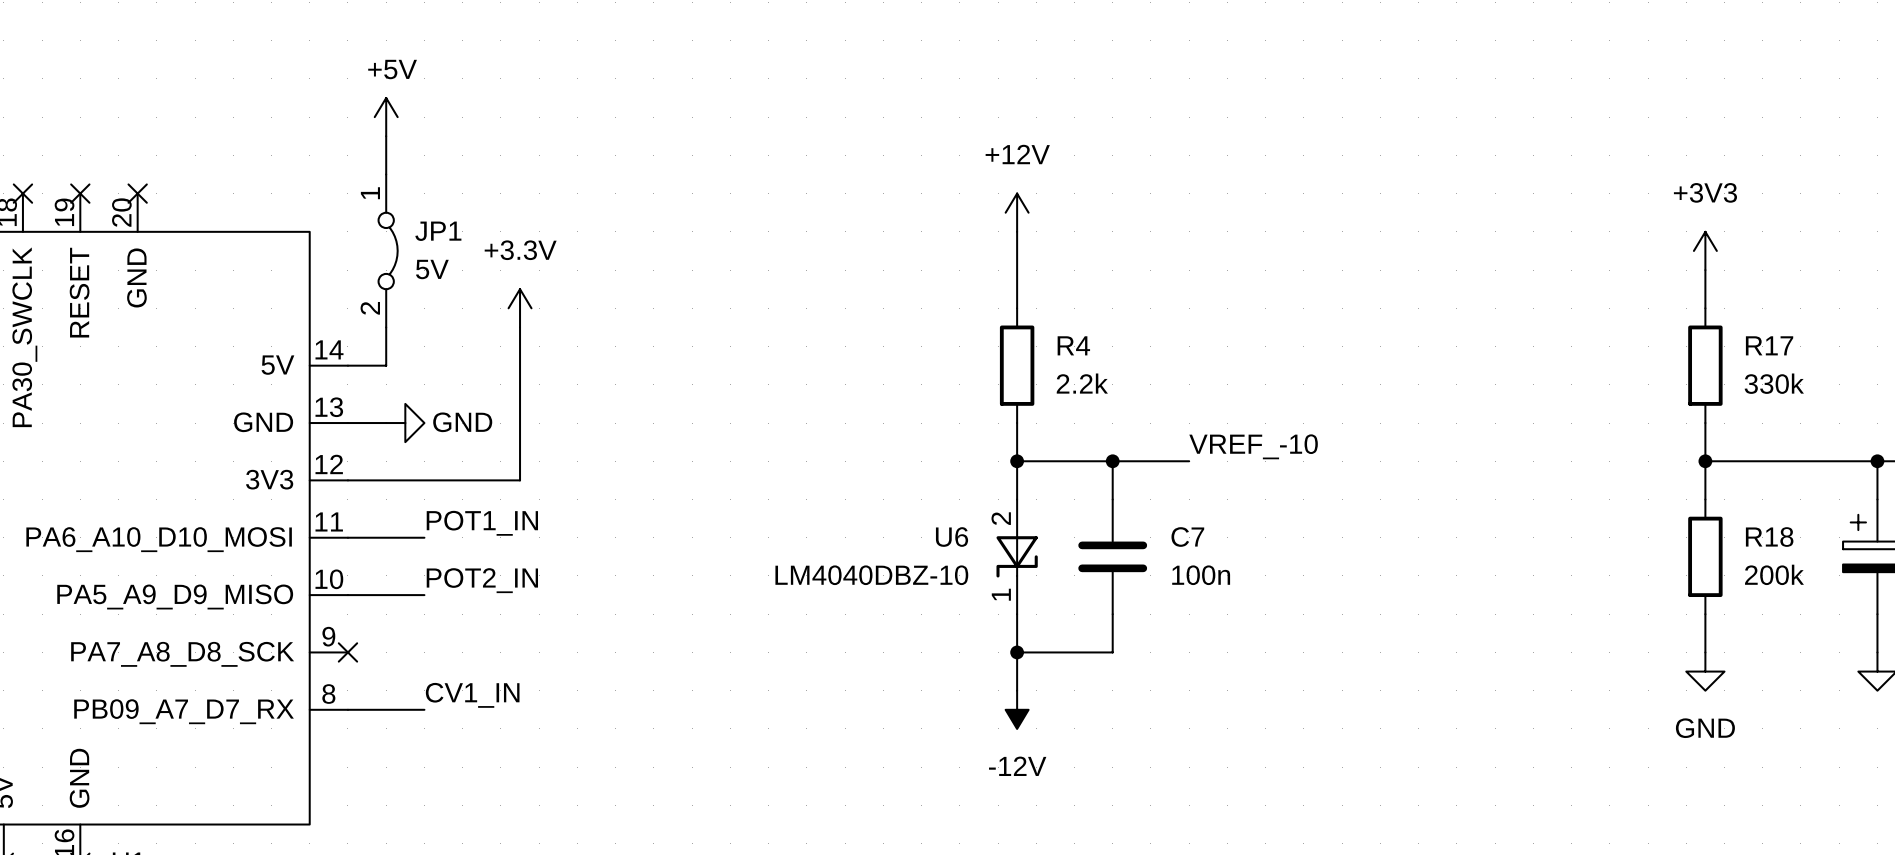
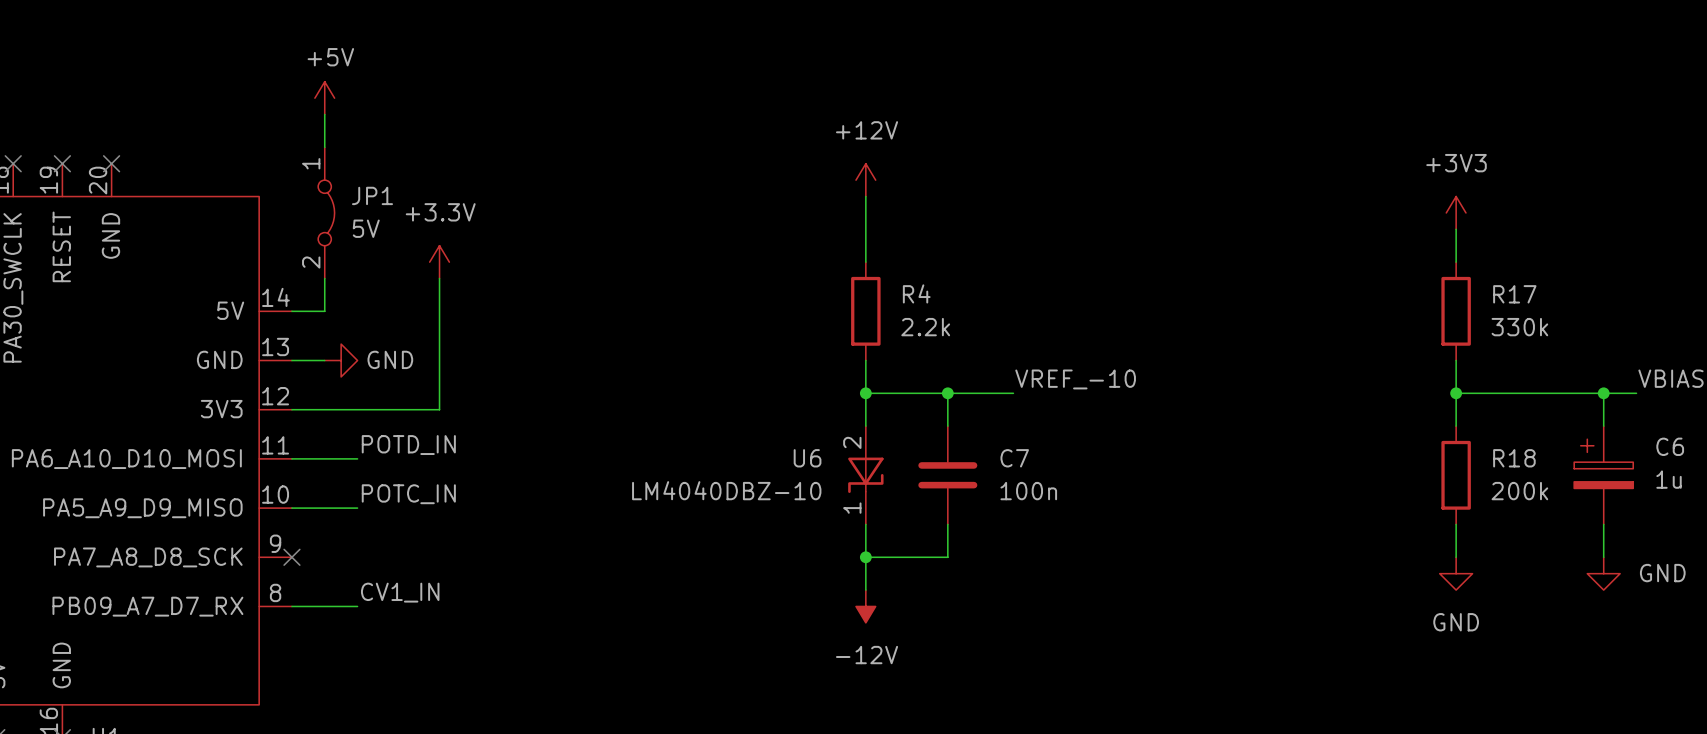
label: POT1_IN (482, 523) -> POTD_IN (408, 445)
label: POT2_IN (482, 580) -> POTC_IN (408, 494)

